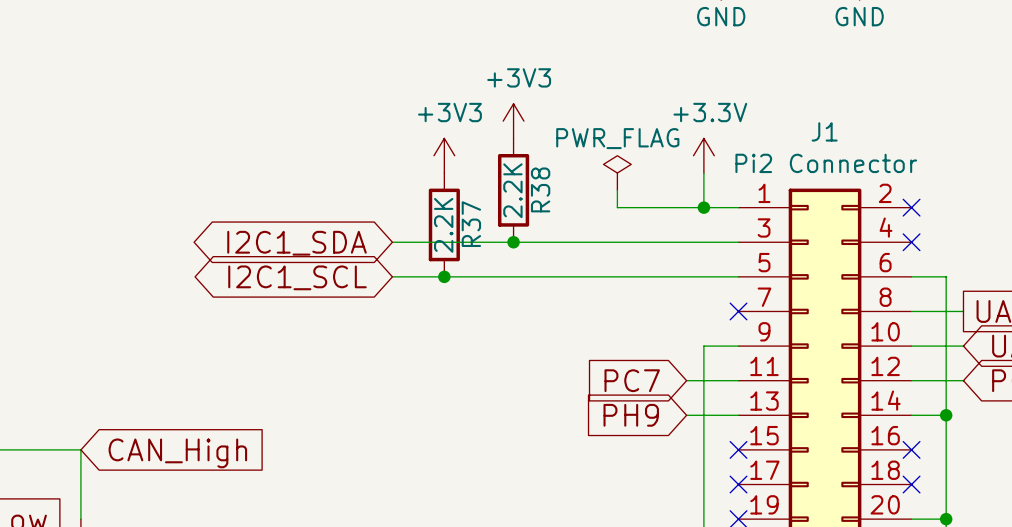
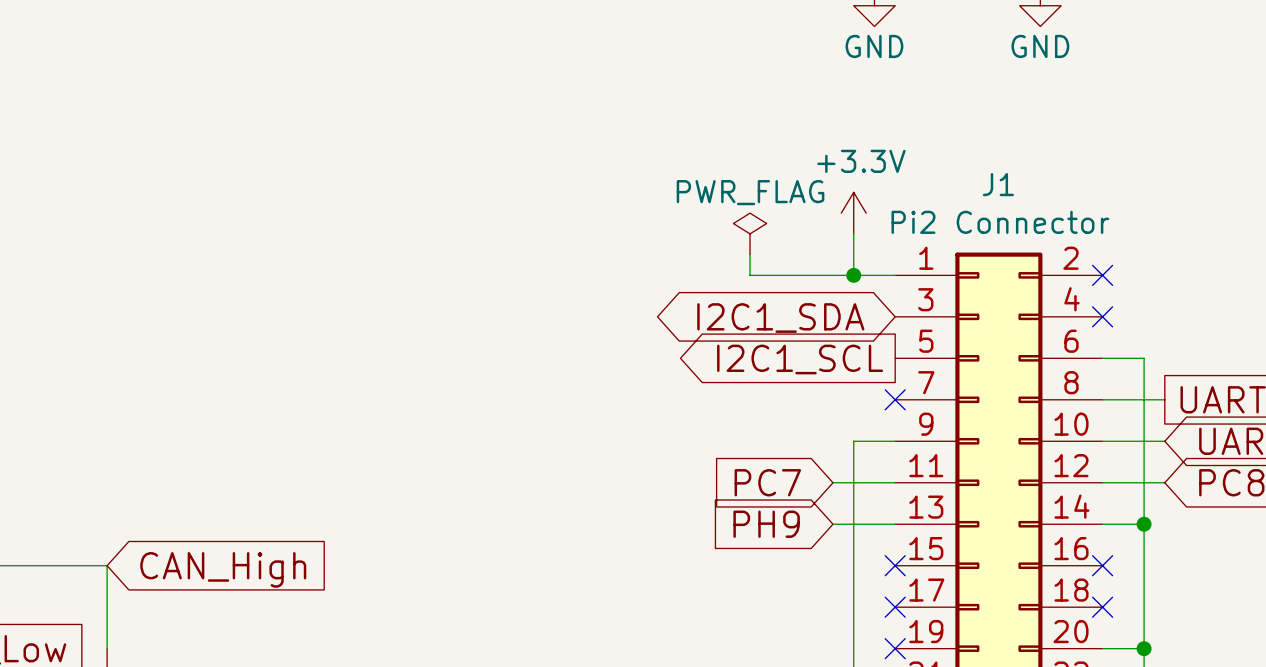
power symbol: +3V3 (513, 121) -> none
power symbol: +3V3 (444, 155) -> none
R38: 2.2K (513, 190) -> none
R37: 2.2K (444, 224) -> none
wire: (392, 242) (738, 242) -> none
junction: (513, 242) -> none
global label: I2C1_SDA (297, 243) -> none
global label: none -> I2C1_SDA (780, 318)
wire: (392, 276) (738, 276) -> none
junction: (444, 276) -> none
global label: I2C1_SCL (297, 277) -> none
global label: none -> I2C1_SCL (800, 359)

